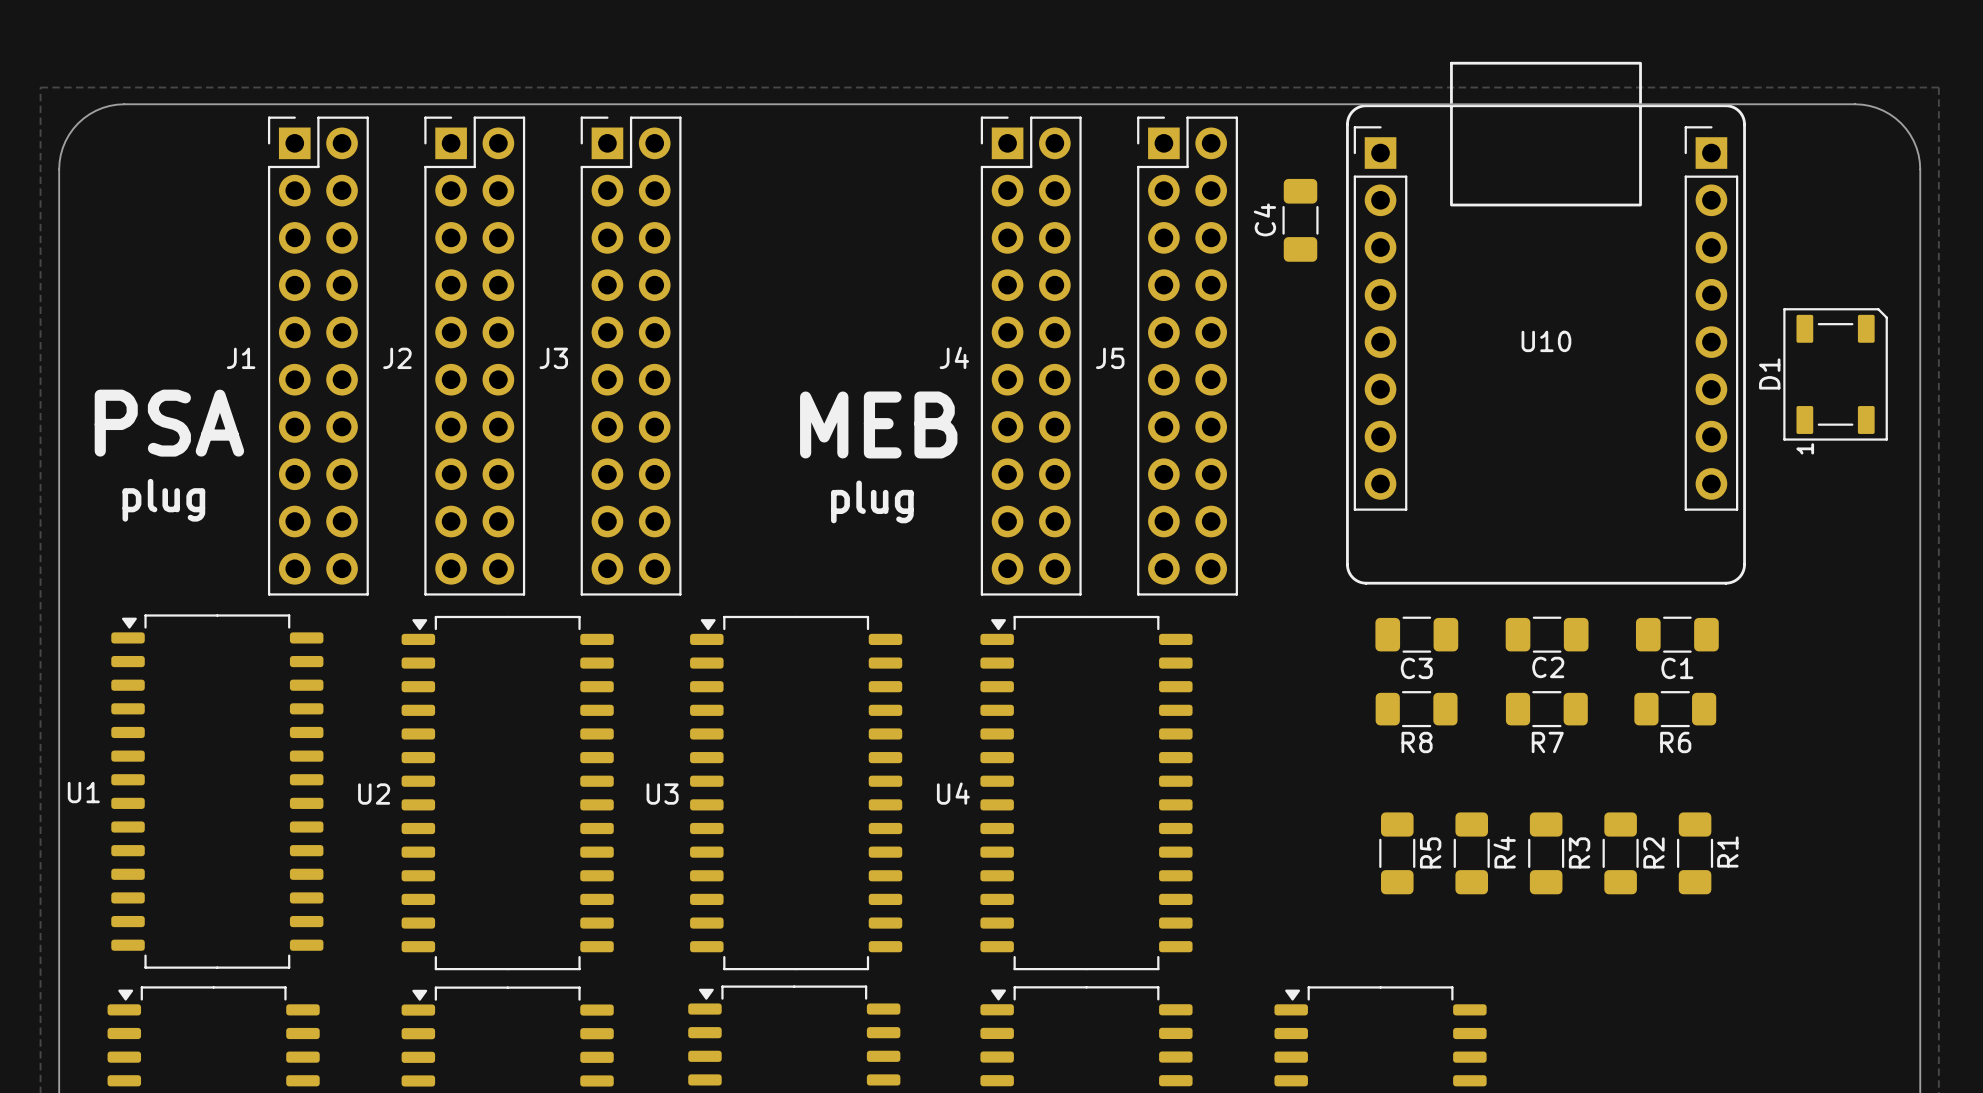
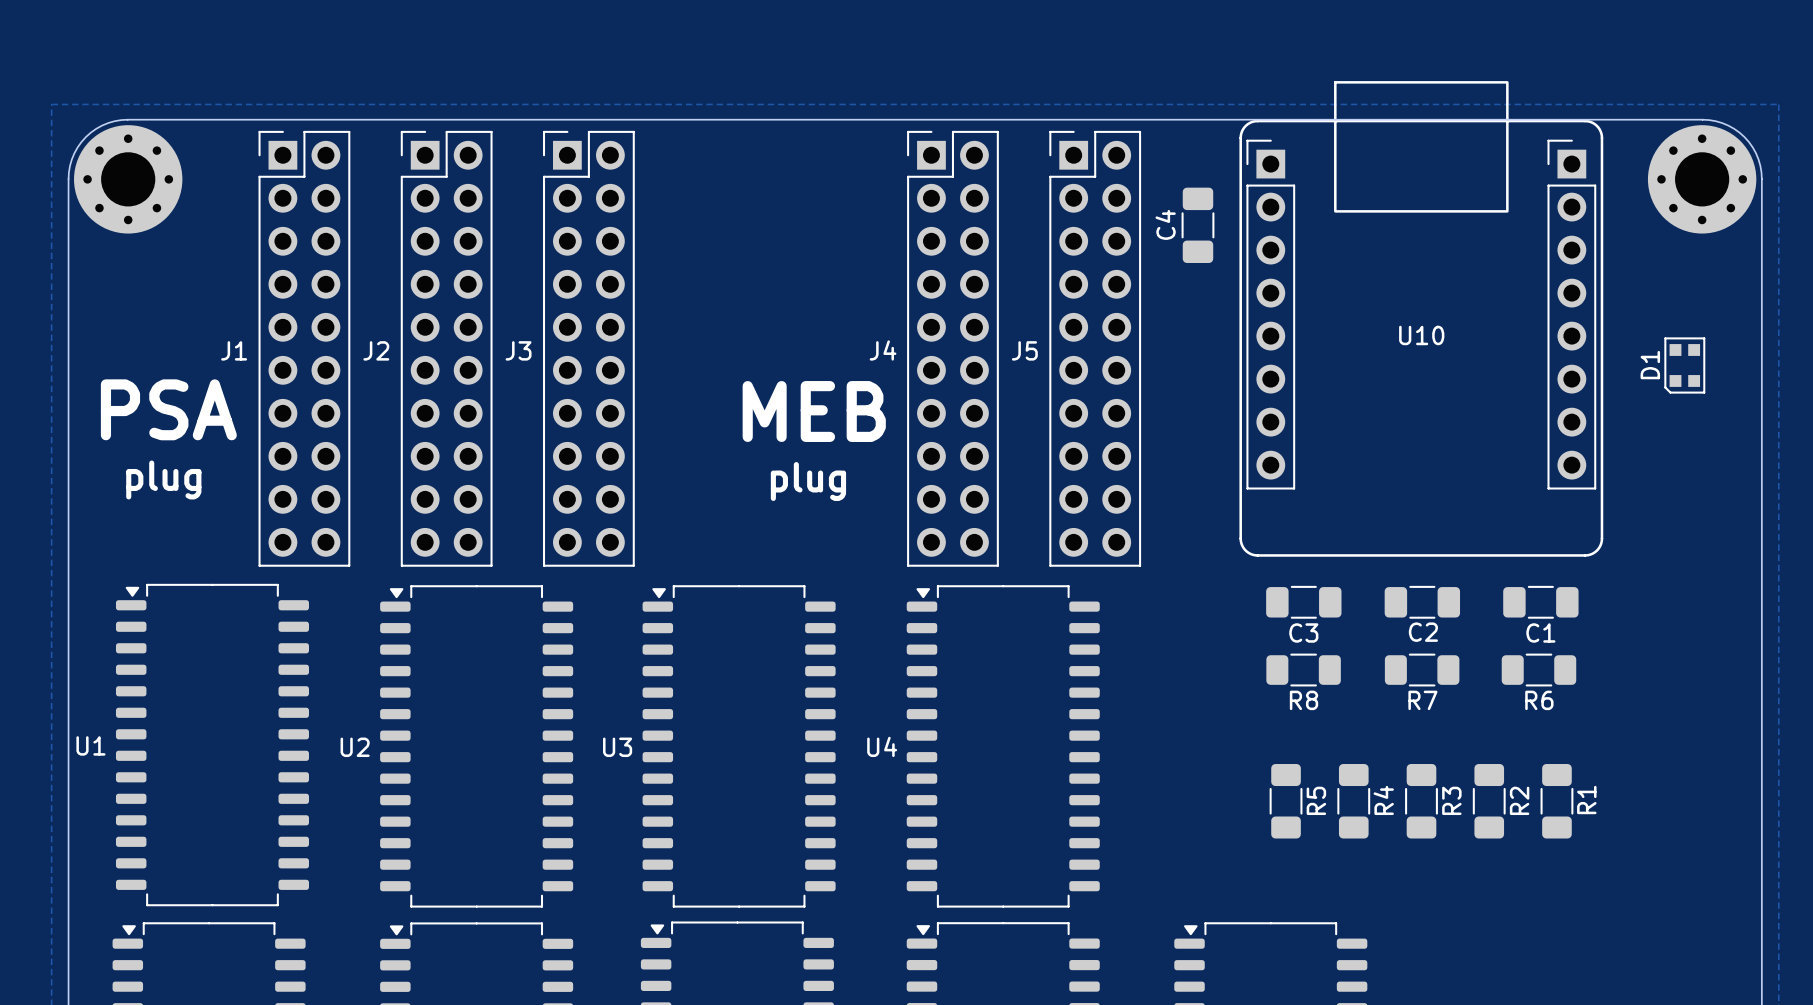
part: none -> (128, 179)
part: none -> (1702, 179)
D1 footprint: [1783, 308, 1888, 441] -> [1664, 337, 1706, 394]

